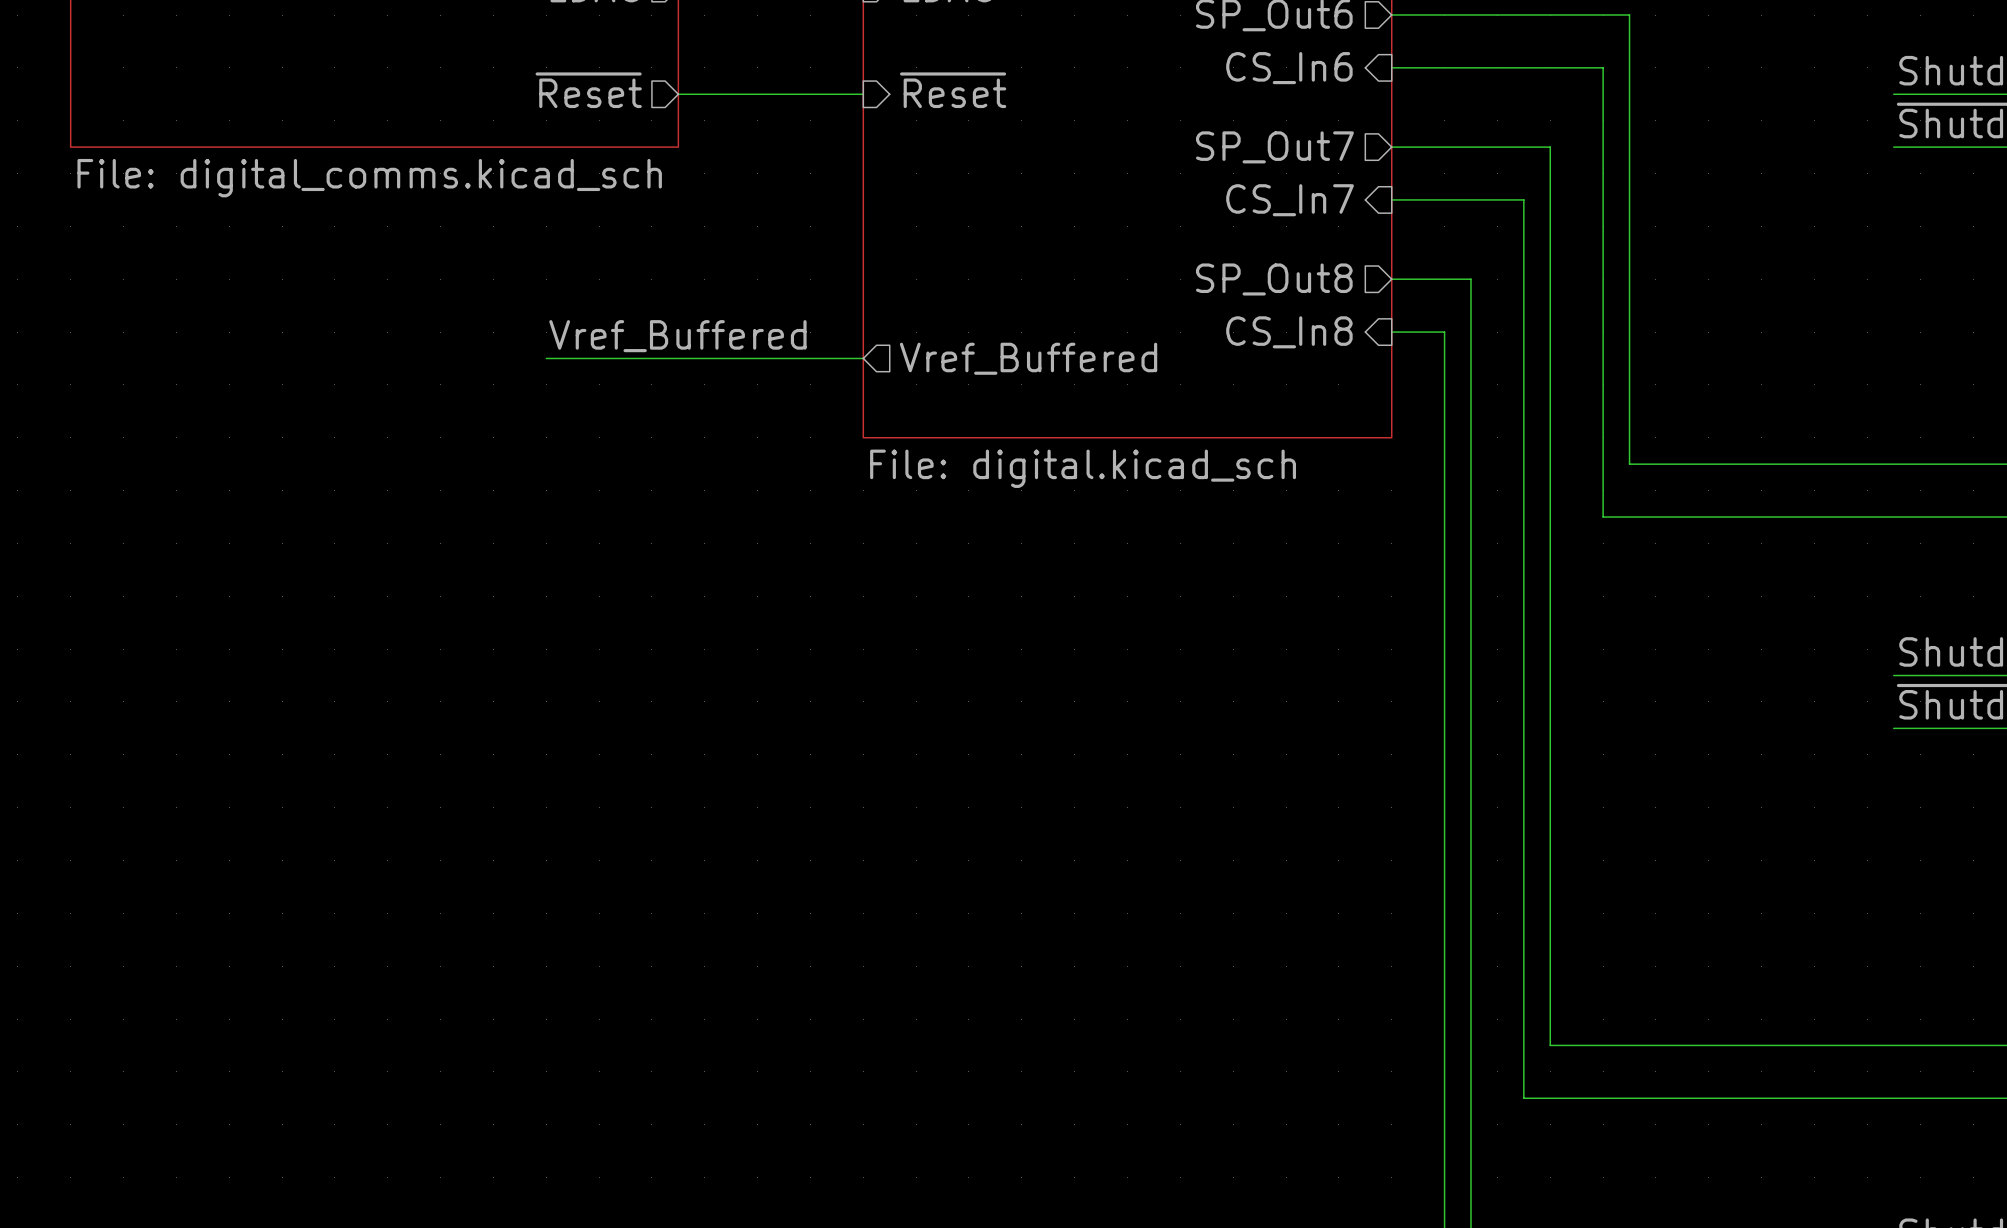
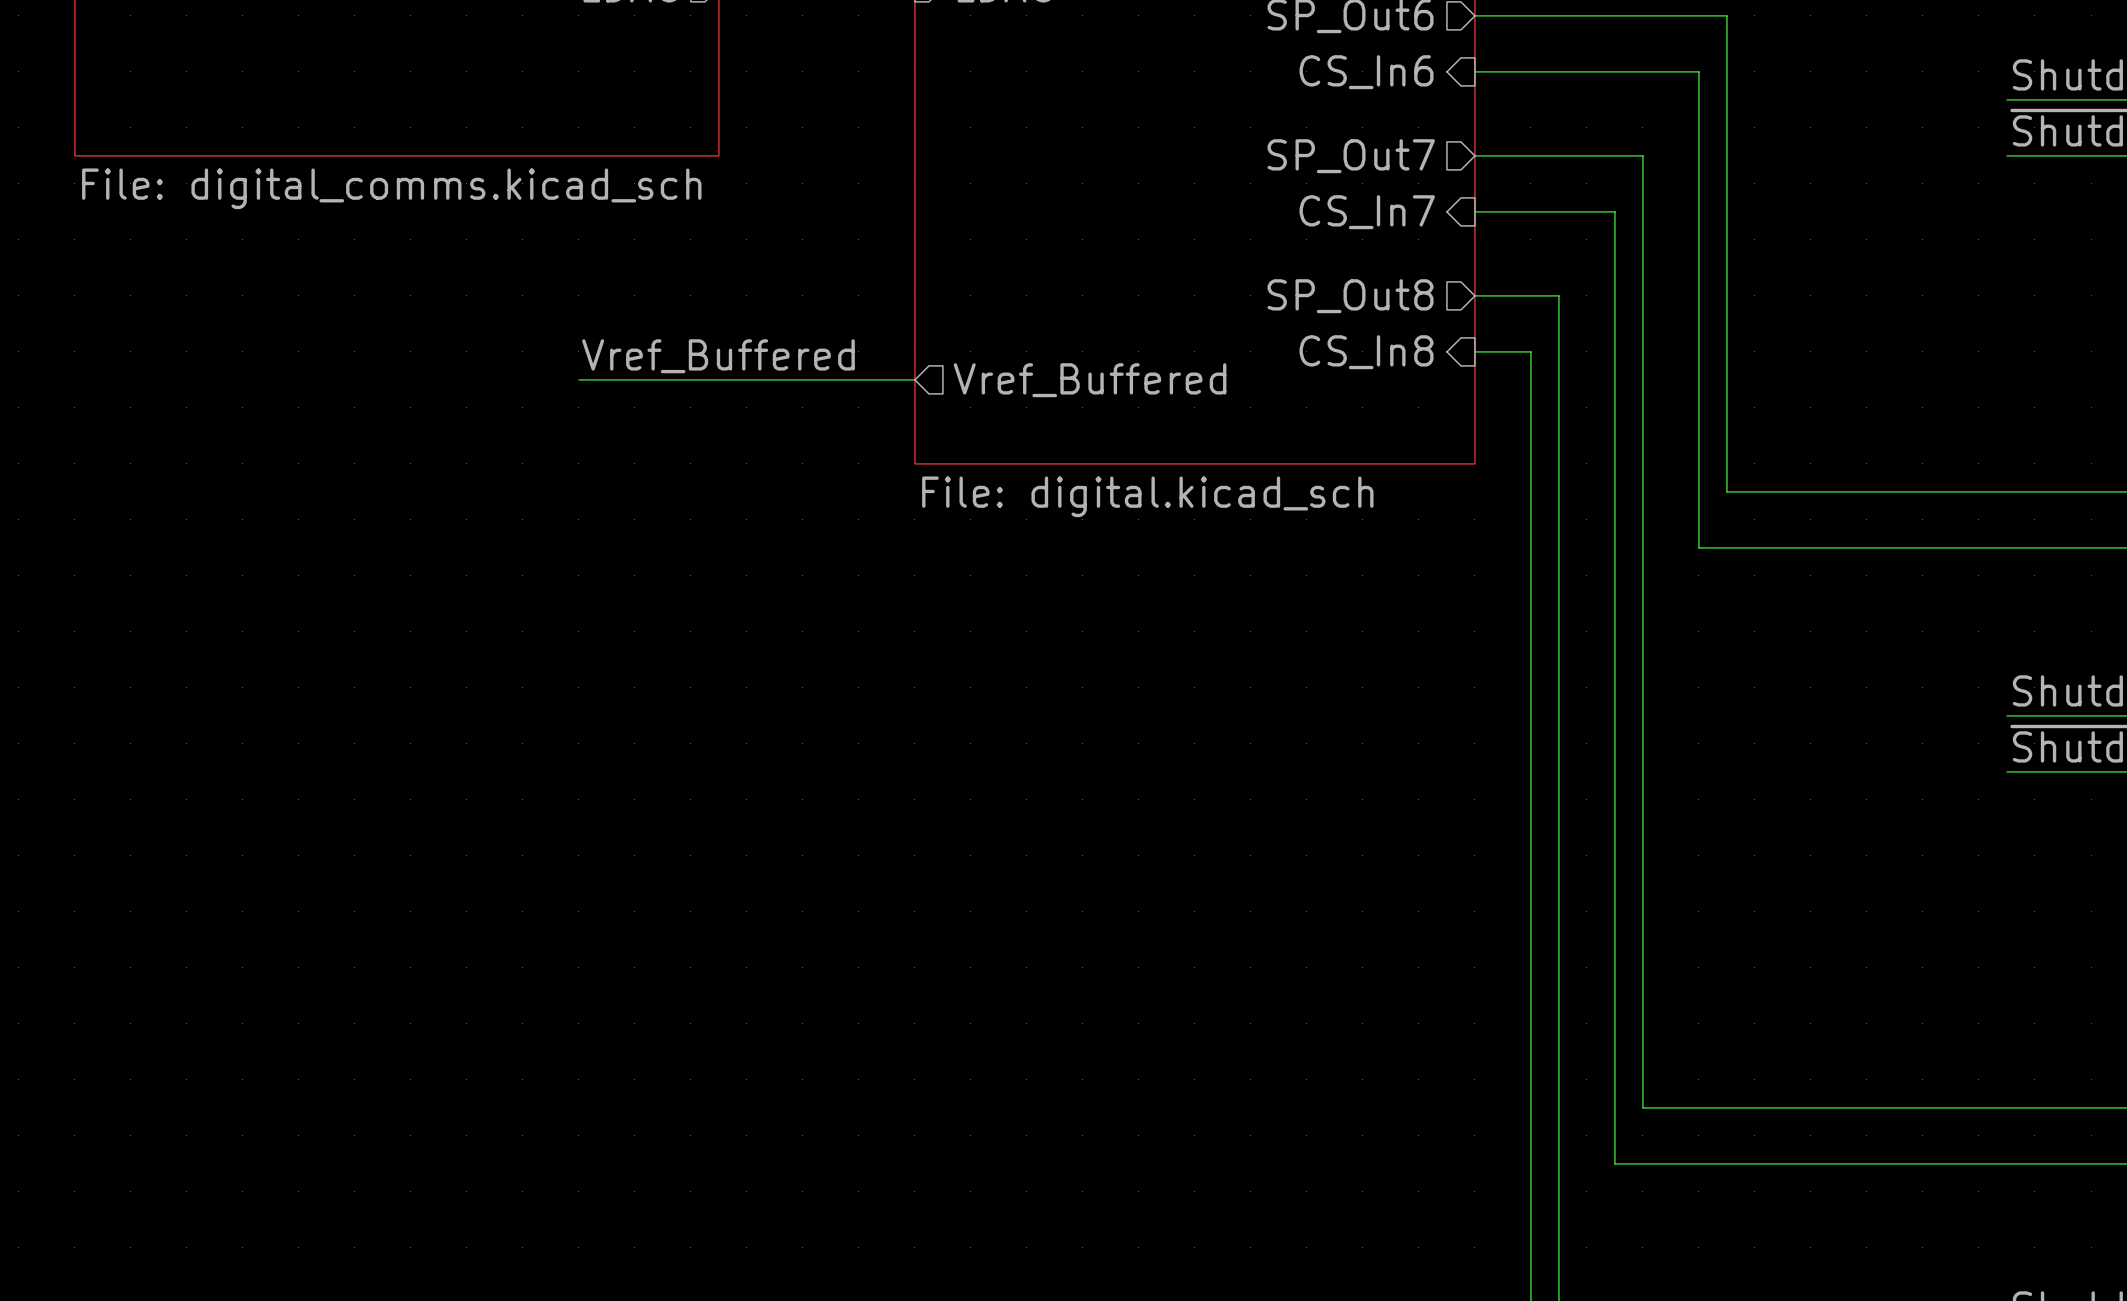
sheet pin: ~{Reset} (588, 90) -> none
sheet pin: ~{Reset} (953, 90) -> none
wire: (678, 94) (863, 94) -> none

